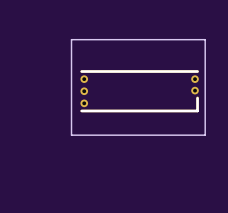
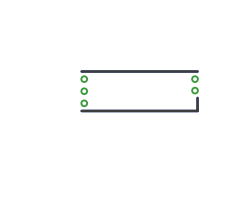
board edge: (205, 39) (71, 39) (71, 135) (205, 135) (205, 39) -> none

